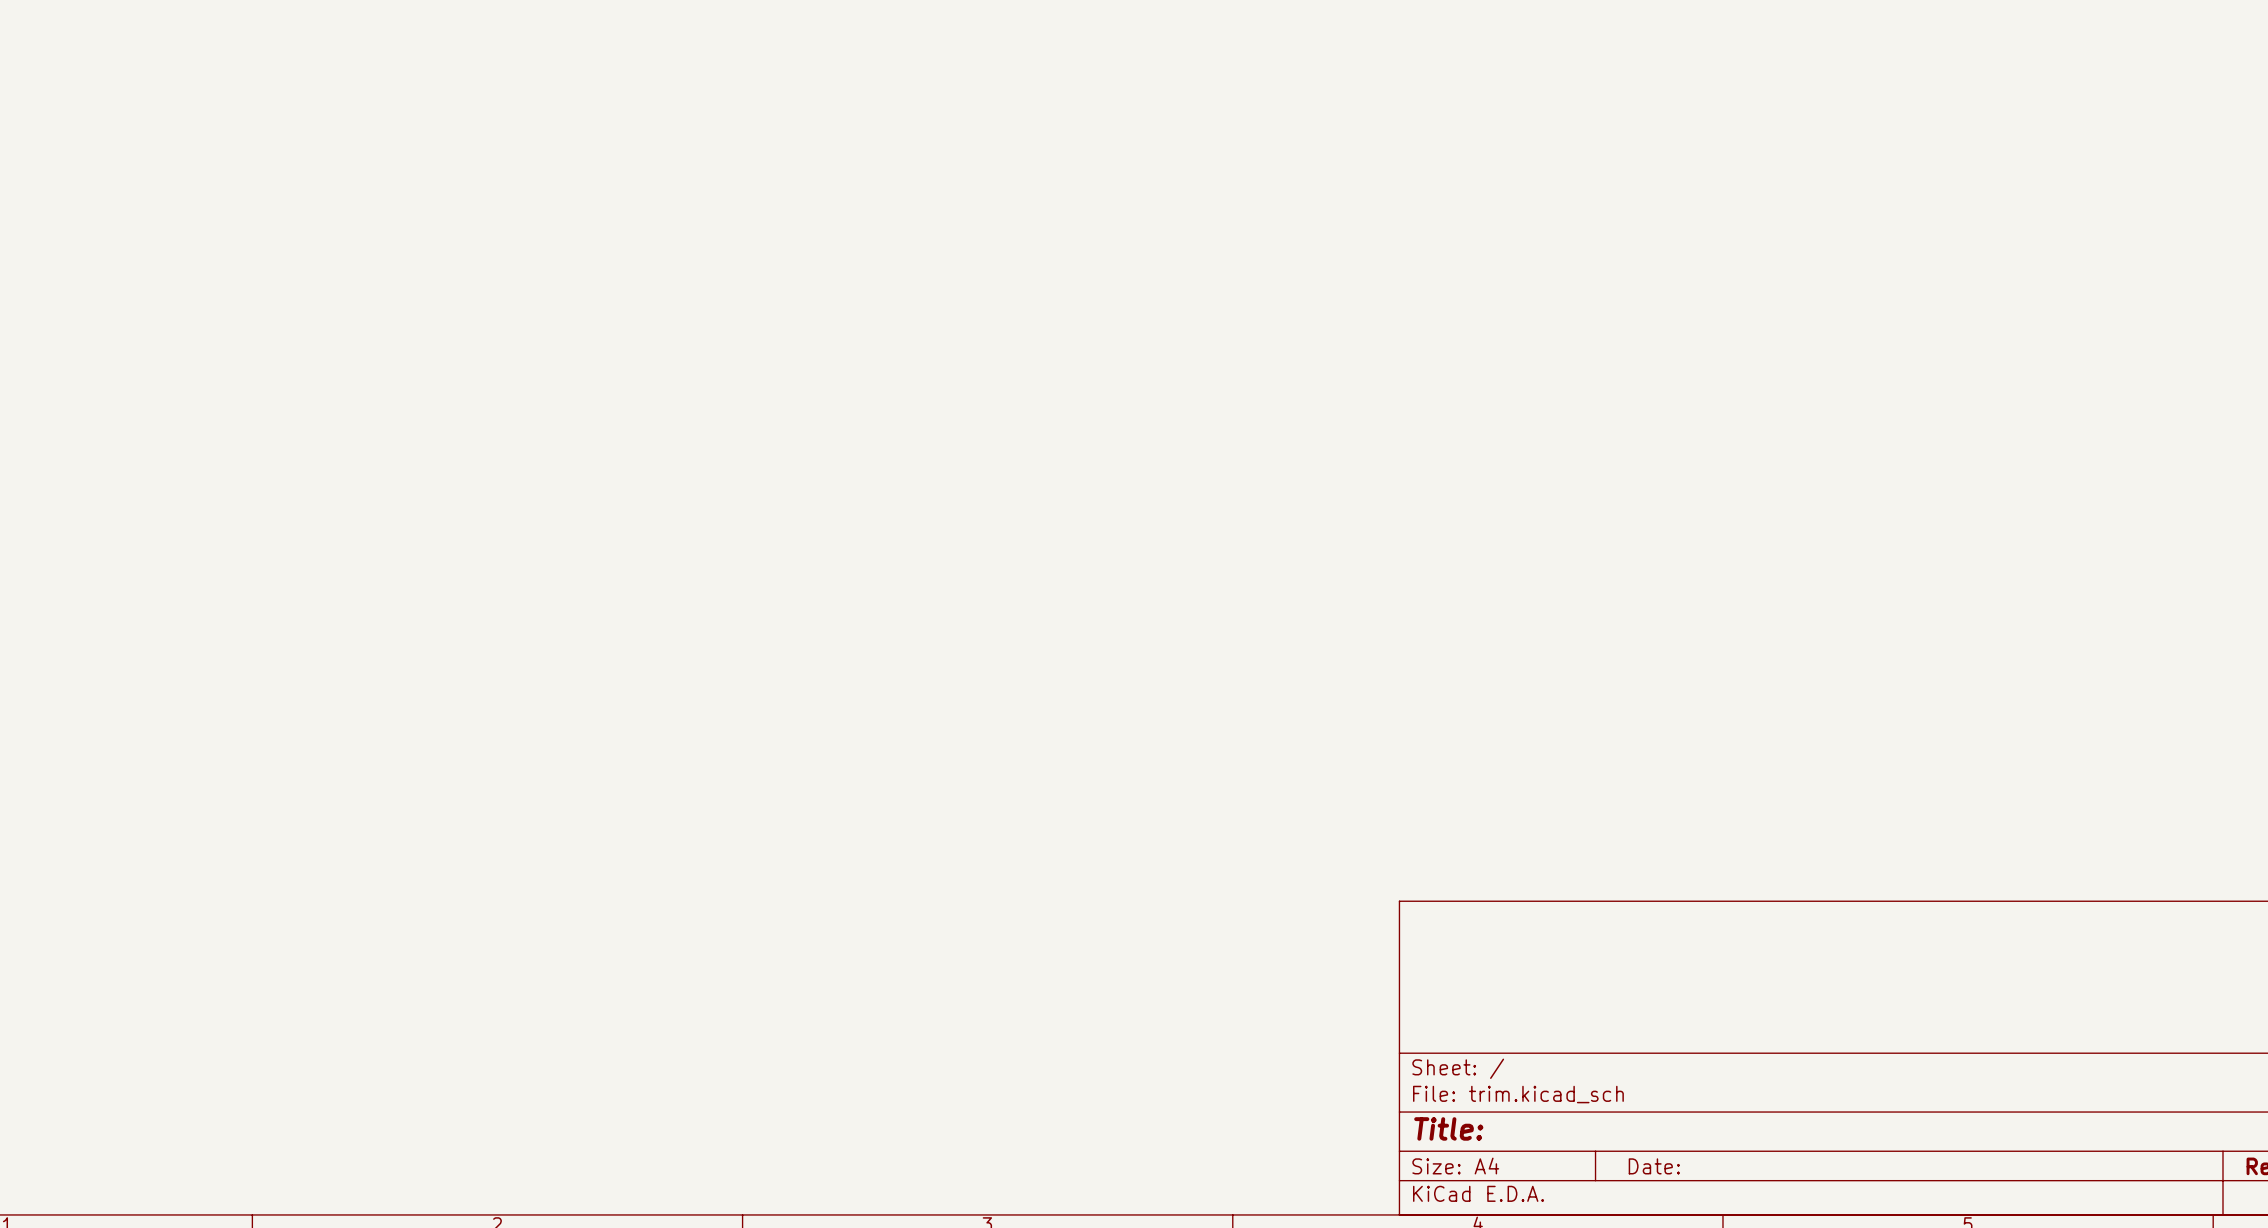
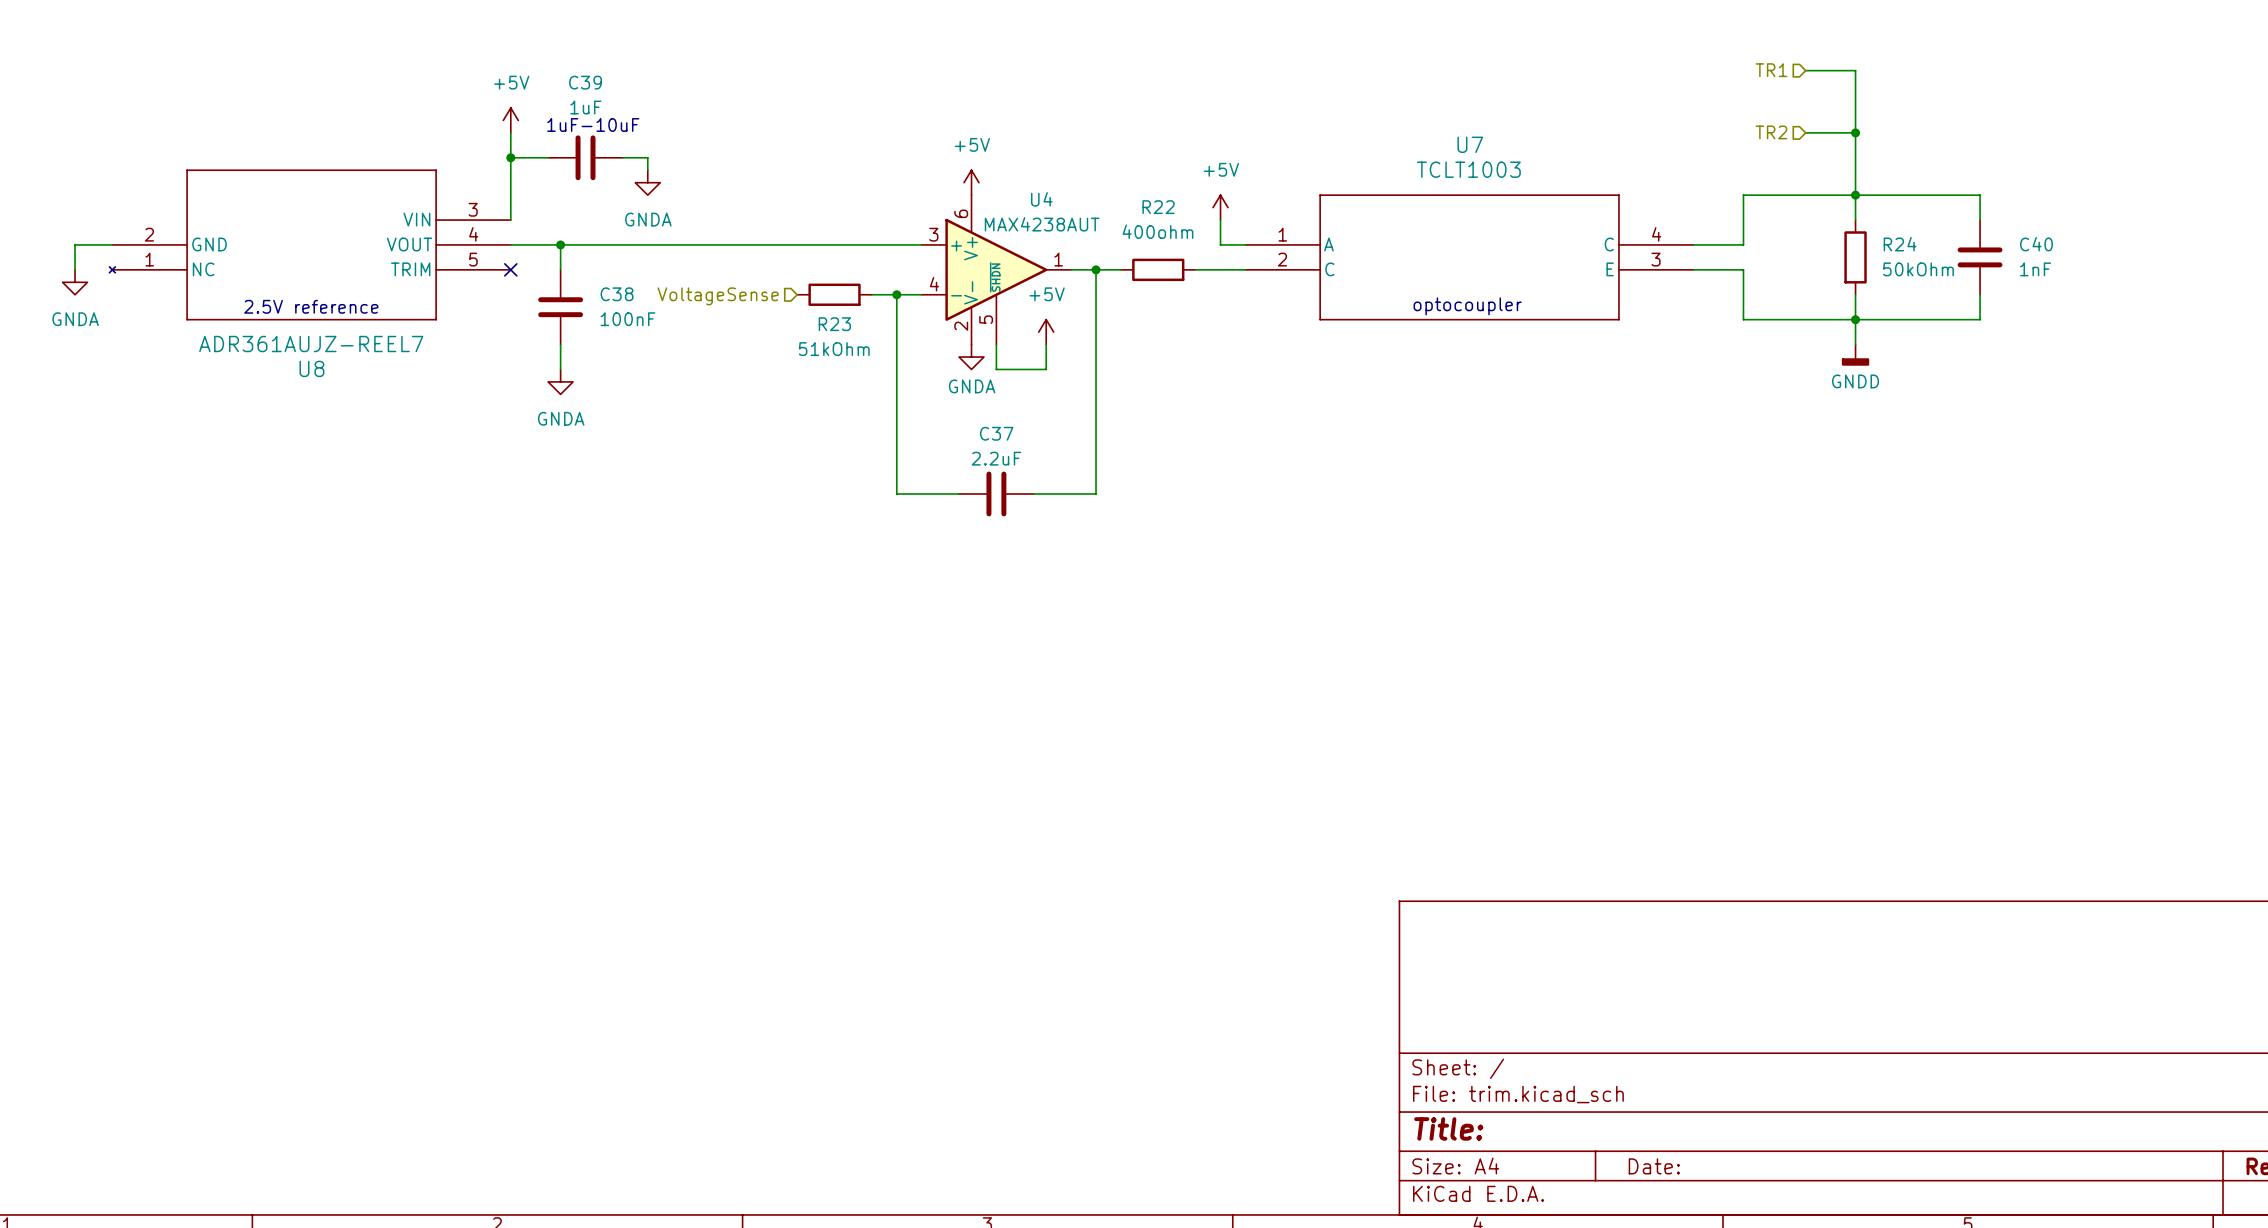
hierarchical label: none -> TR1 (1771, 70)
wire: none -> (1805, 70) (1855, 70) (1855, 220)
power symbol: none -> +5V (510, 120)
text: none -> 1uF-10uF (593, 125)
wire: none -> (510, 132) (510, 220)
hierarchical label: none -> TR2 (1771, 132)
wire: none -> (1805, 132) (1855, 132)
junction: none -> (1855, 132)
wire: none -> (510, 157) (548, 157)
junction: none -> (510, 157)
C39: none -> 1uF (585, 157)
wire: none -> (622, 157) (647, 157) (647, 170)
power symbol: none -> GNDA (647, 182)
power symbol: none -> +5V (971, 182)
junction: none -> (1855, 195)
power symbol: none -> +5V (1220, 207)
wire: none -> (1220, 220) (1220, 244) (1245, 244)
wire: none -> (1980, 220) (1980, 195) (1743, 195) (1743, 244) (1693, 244)
wire: none -> (112, 244) (75, 244) (75, 269)
U8: none -> ADR361AUJZ-REEL7 (310, 244)
wire: none -> (510, 244) (921, 244)
wire: none -> (560, 244) (560, 269)
junction: none -> (560, 244)
U7: none -> TCLT1003 (1469, 257)
R24: none -> 50kOhm (1855, 257)
C40: none -> 1nF (1980, 257)
no-connect mark: none -> (510, 269)
U4: none -> MAX4238AUT (996, 269)
wire: none -> (1071, 269) (1120, 269)
wire: none -> (1096, 269) (1096, 493) (1033, 493)
junction: none -> (1096, 269)
R22: none -> 400ohm (1158, 269)
wire: none -> (1195, 269) (1245, 269)
wire: none -> (1693, 269) (1743, 269) (1743, 319) (1980, 319) (1980, 294)
power symbol: none -> GNDA (75, 282)
R23: none -> 51kOhm (834, 294)
wire: none -> (871, 294) (921, 294)
wire: none -> (896, 294) (896, 493) (959, 493)
junction: none -> (896, 294)
wire: none -> (1855, 294) (1855, 344)
hierarchical label: none -> VoltageSense (718, 296)
text: none -> 2.5V reference (311, 306)
text: none -> optocoupler (1467, 306)
C38: none -> 100nF (560, 307)
junction: none -> (1855, 319)
power symbol: none -> +5V (1046, 332)
wire: none -> (560, 344) (560, 369)
wire: none -> (996, 344) (996, 369) (1046, 369) (1046, 344)
power symbol: none -> GNDD (1855, 355)
power symbol: none -> GNDA (971, 357)
power symbol: none -> GNDA (560, 381)
C37: none -> 2.2uF (996, 493)

